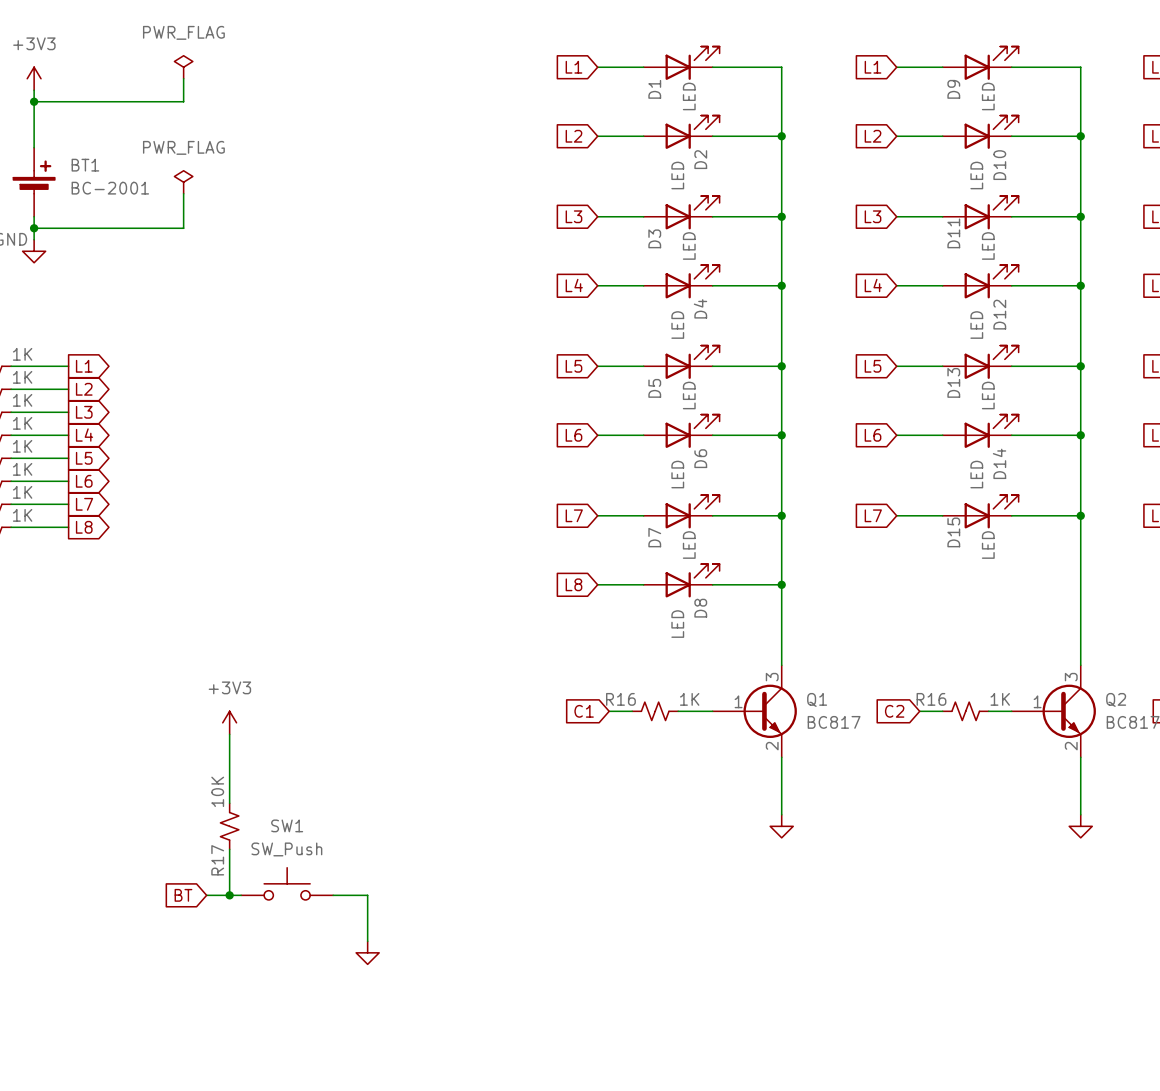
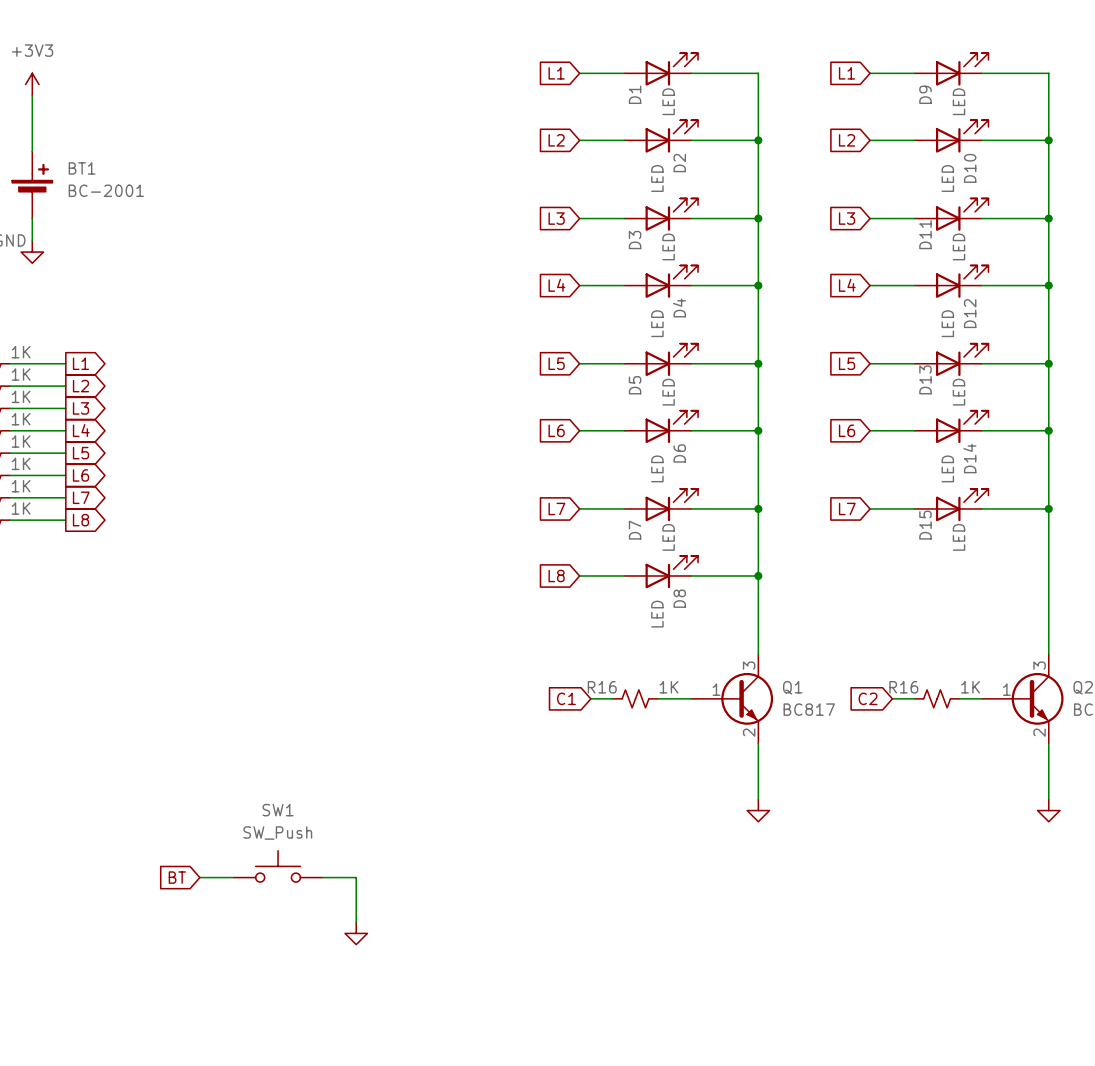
power symbol: PWR_FLAG (183, 67) -> none
wire: (183, 78) (183, 101) (34, 101) -> none
junction: (34, 101) -> none
power symbol: PWR_FLAG (183, 182) -> none
wire: (183, 193) (183, 228) (34, 228) -> none
junction: (34, 228) -> none
power symbol: +3V3 (229, 722) -> none
wire: (229, 734) (229, 803) -> none
R17: 10K (229, 826) -> none
wire: (229, 849) (229, 895) -> none
junction: (229, 895) -> none

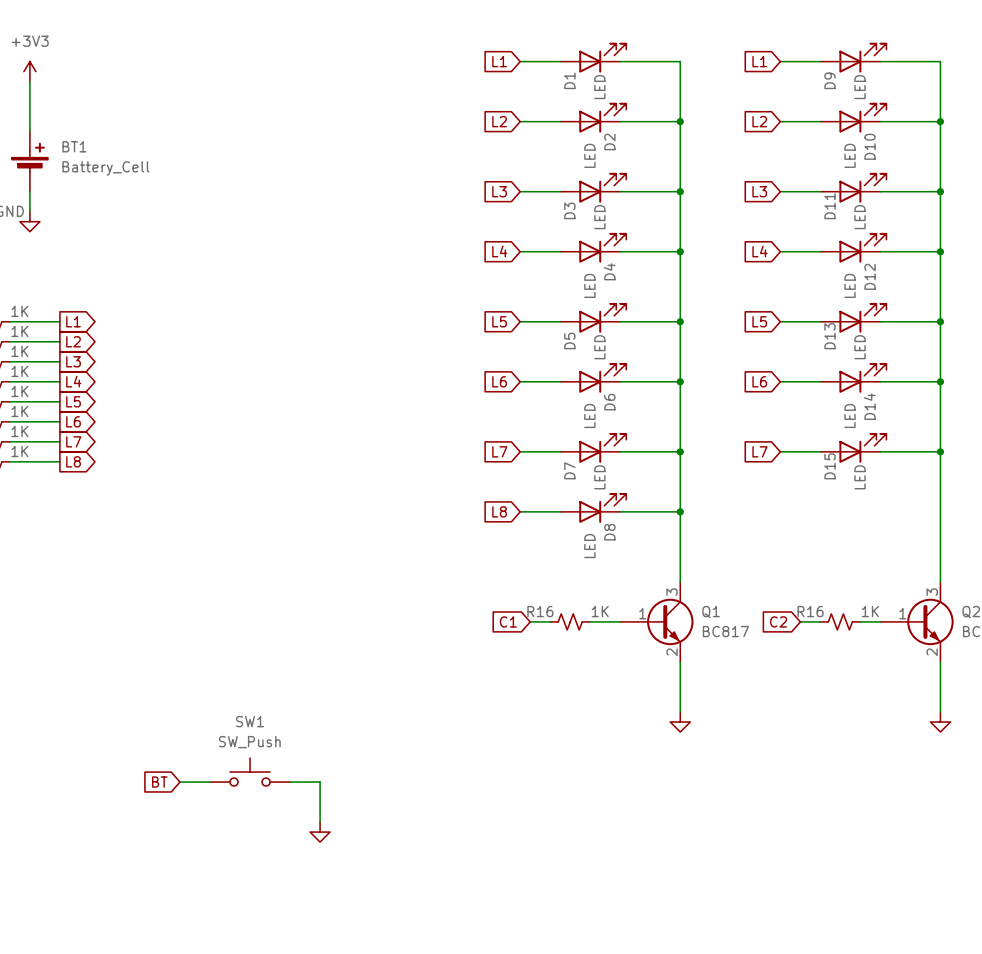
BT1 value: BC-2001 (106, 190) -> Battery_Cell (105, 168)

